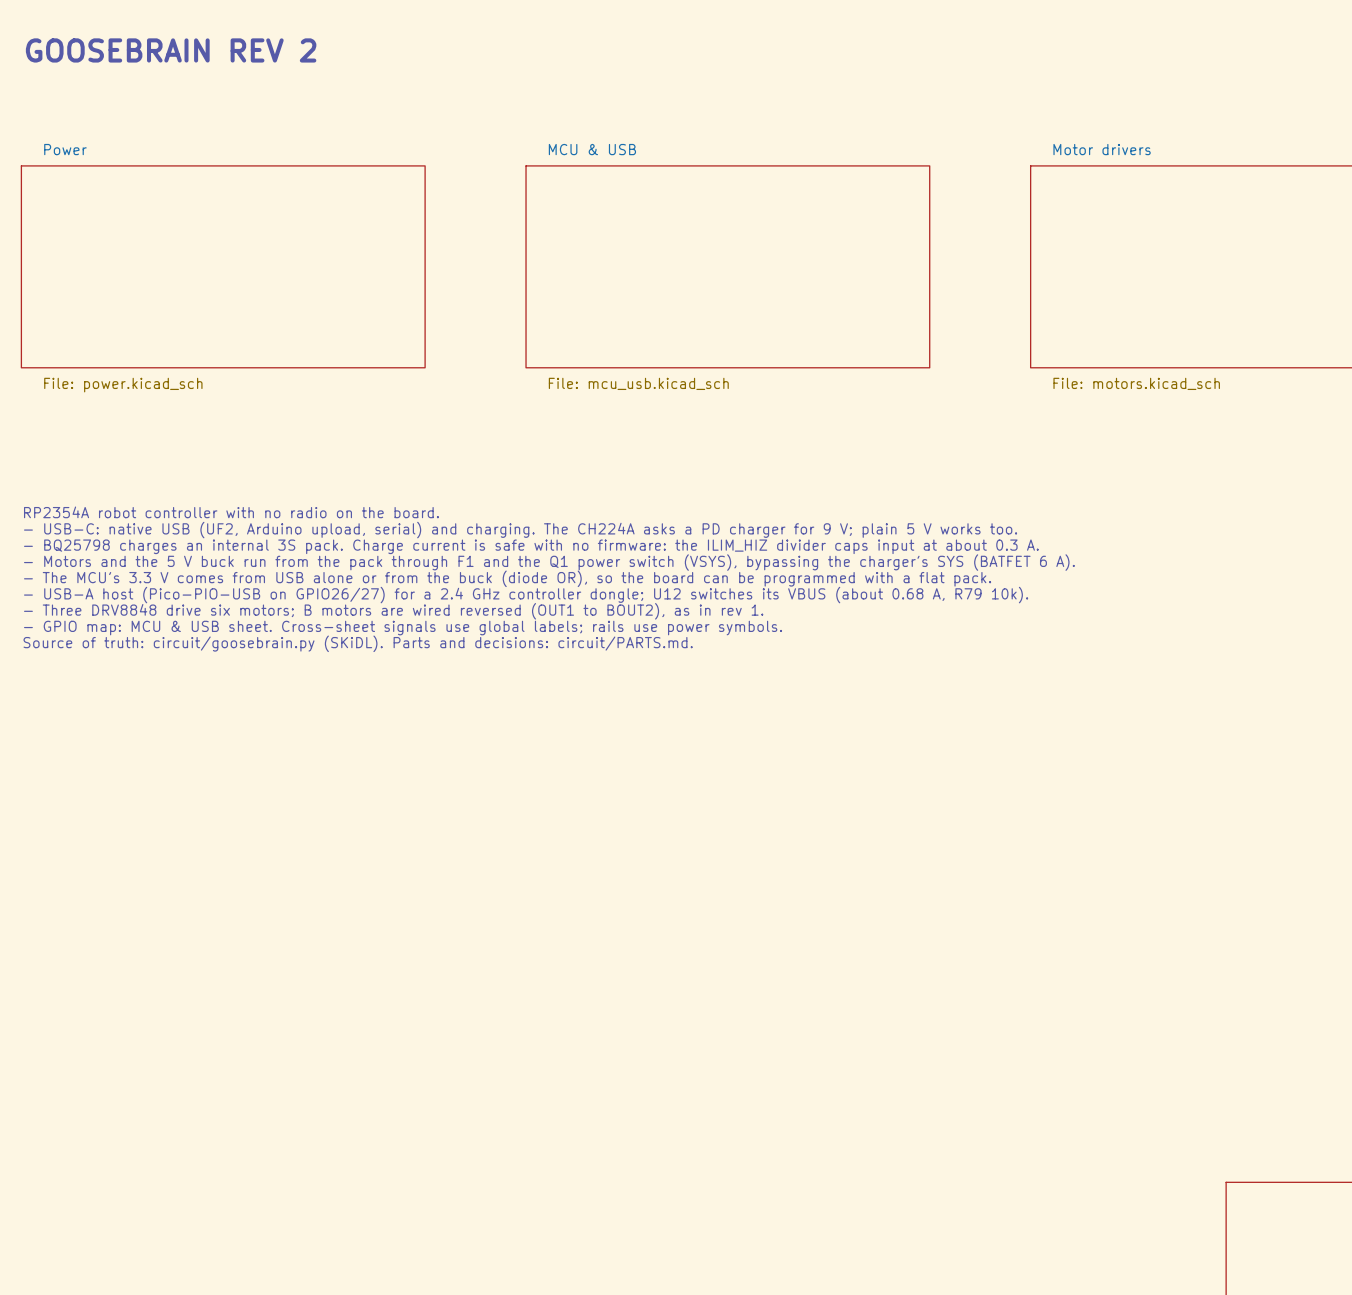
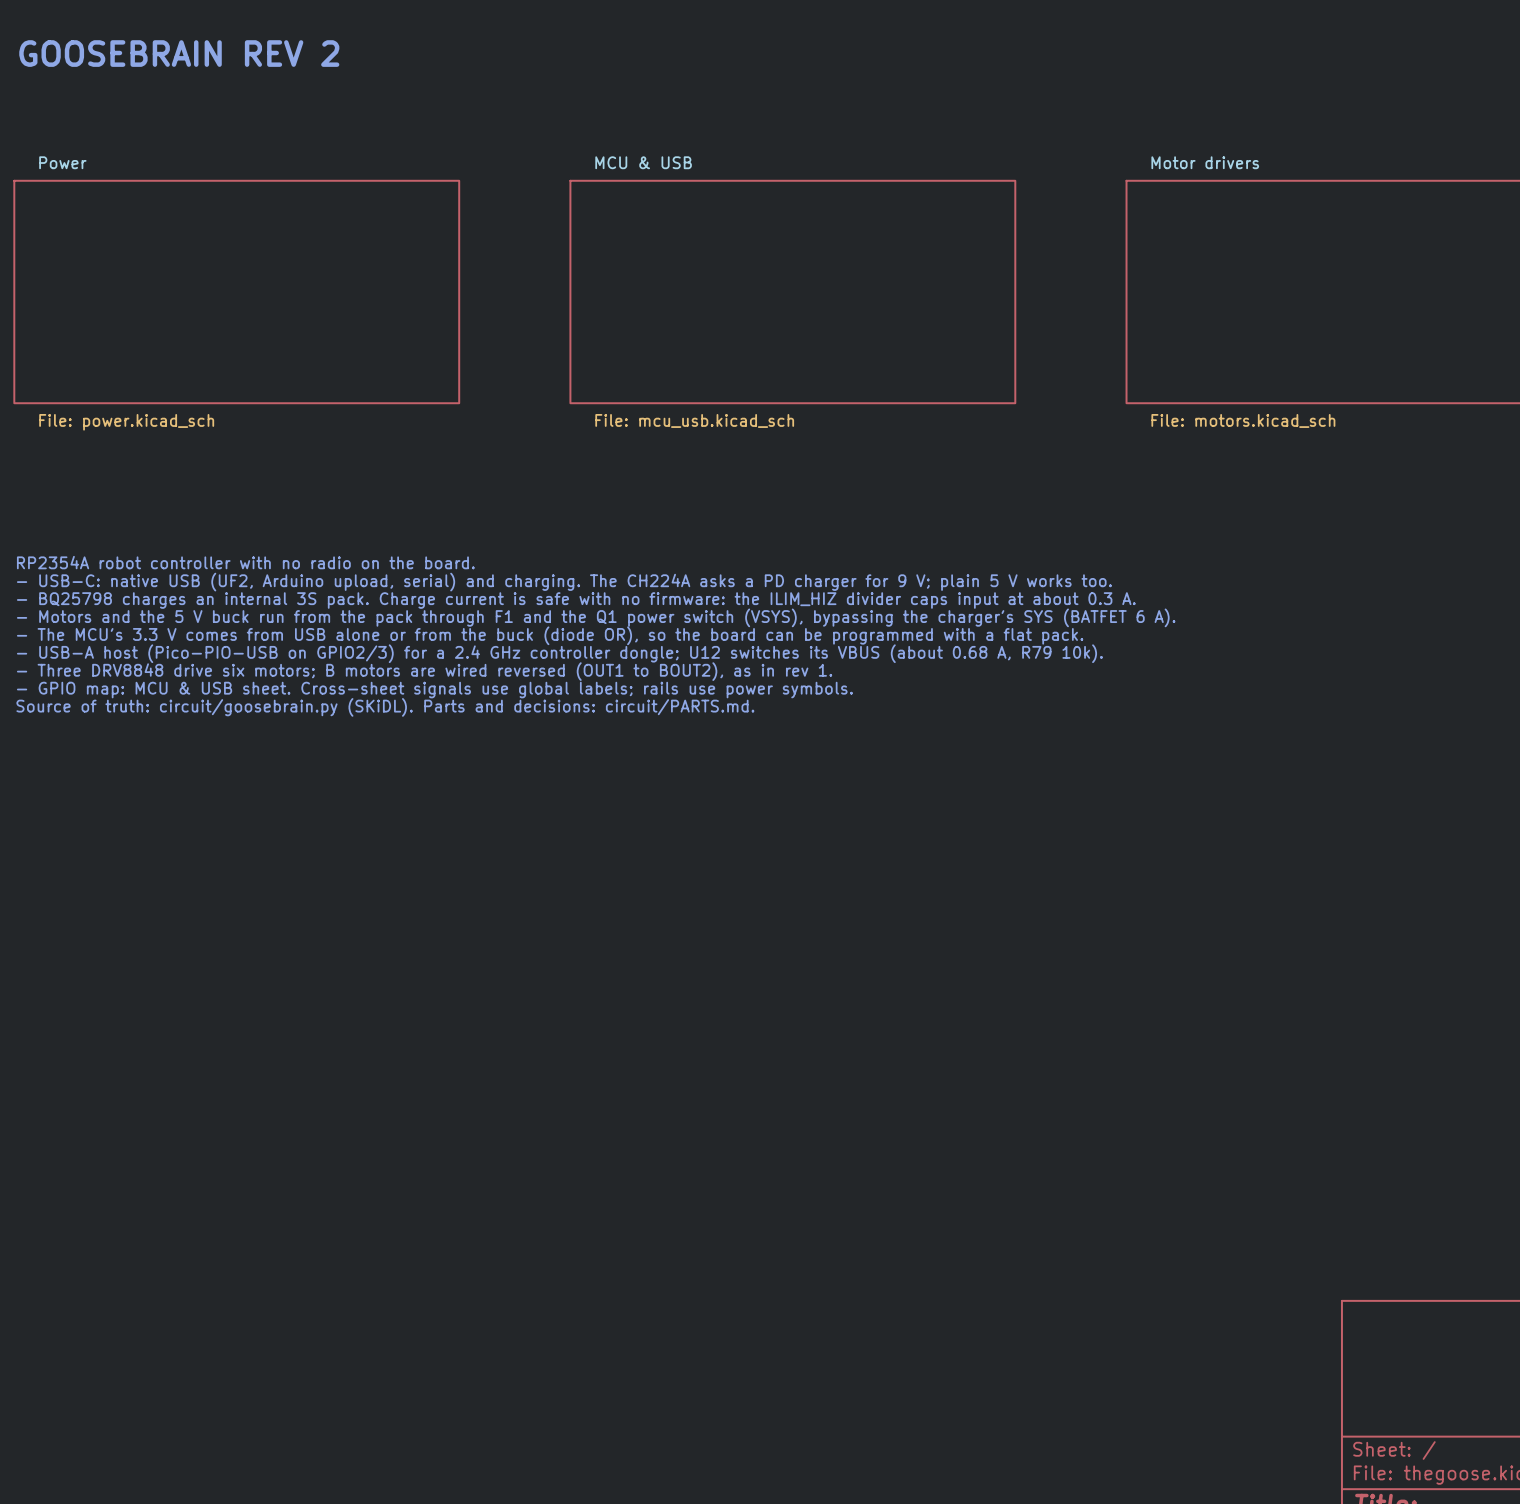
text: - USB-A host (Pico-PIO-USB on GPIO26/27) for a 2.4 GHz controller dongle; U12 switches its VBUS (about 0.68 A, R79 10k). (526, 595) -> - USB-A host (Pico-PIO-USB on GPIO2/3) for a 2.4 GHz controller dongle; U12 switches its VBUS (about 0.68 A, R79 10k). (559, 653)

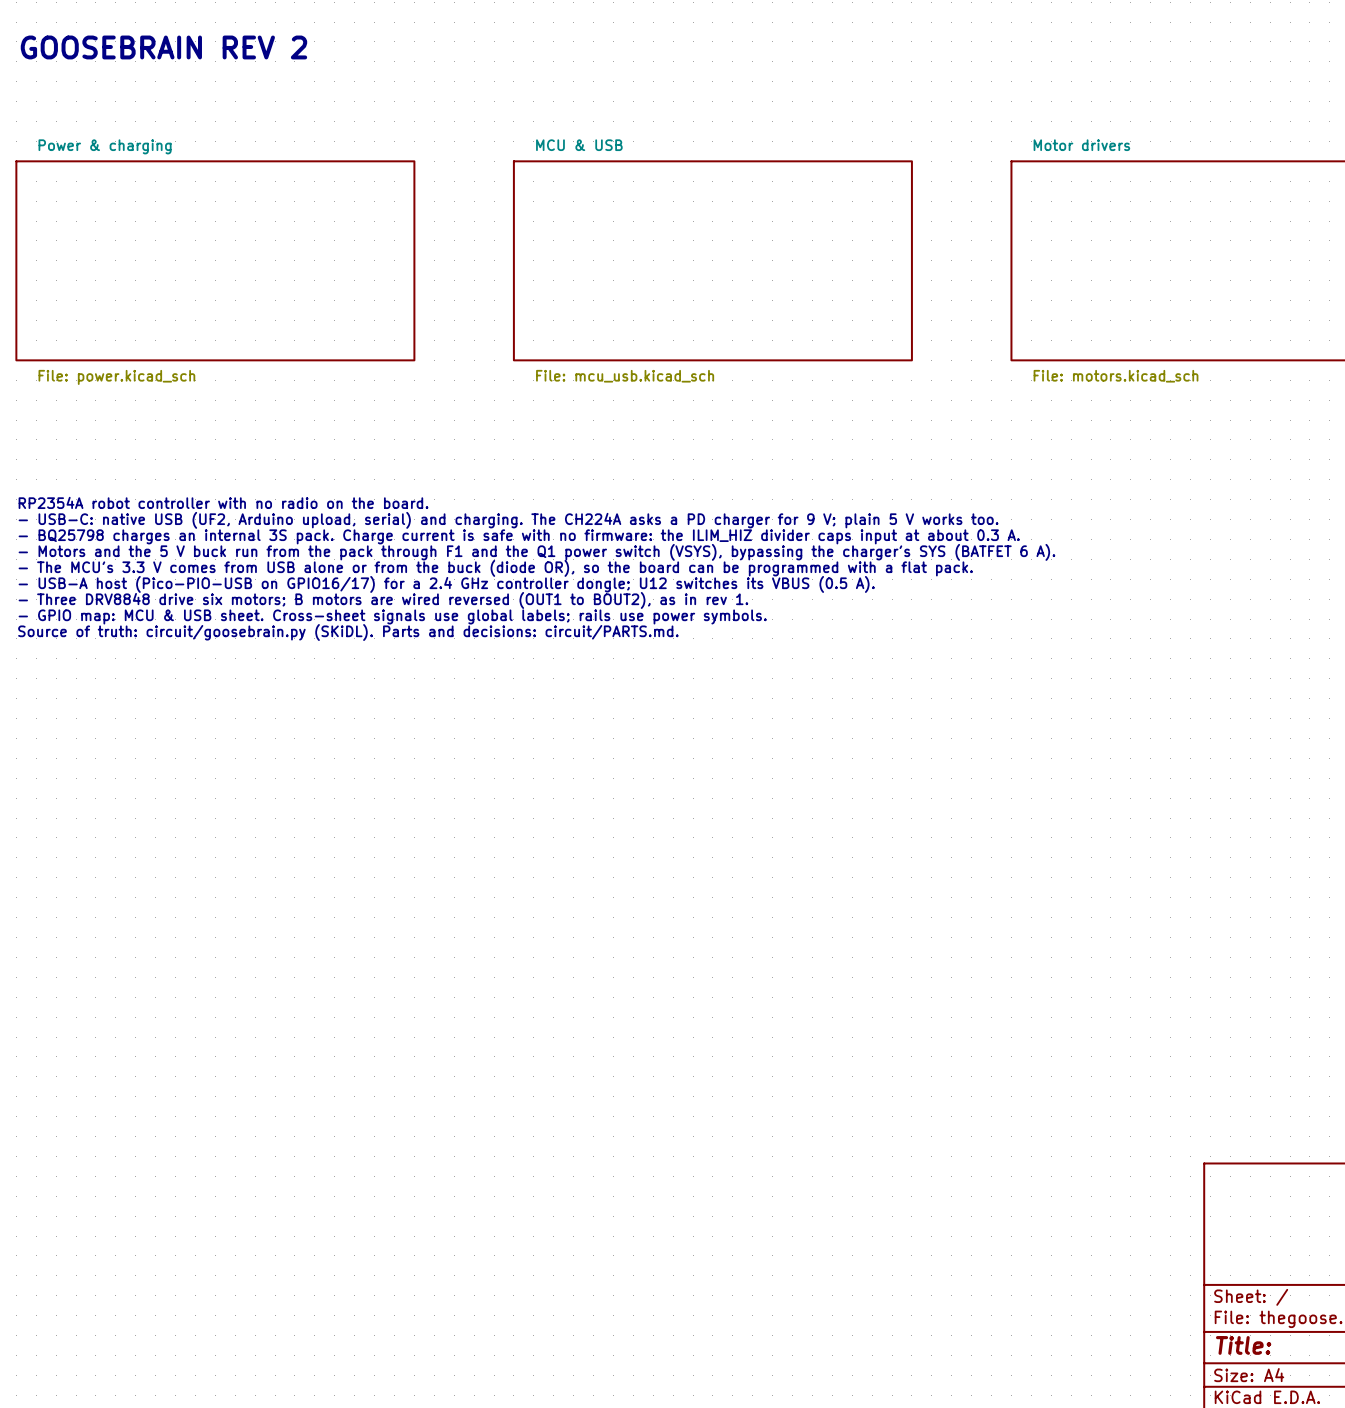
sheet Power name: Power (62, 162) -> Power & charging (105, 146)
text: - USB-A host (Pico-PIO-USB on GPIO2/3) for a 2.4 GHz controller dongle; U12 switches its VBUS (about 0.68 A, R79 10k). (559, 653) -> - USB-A host (Pico-PIO-USB on GPIO16/17) for a 2.4 GHz controller dongle; U12 switches its VBUS (0.5 A). (446, 584)

